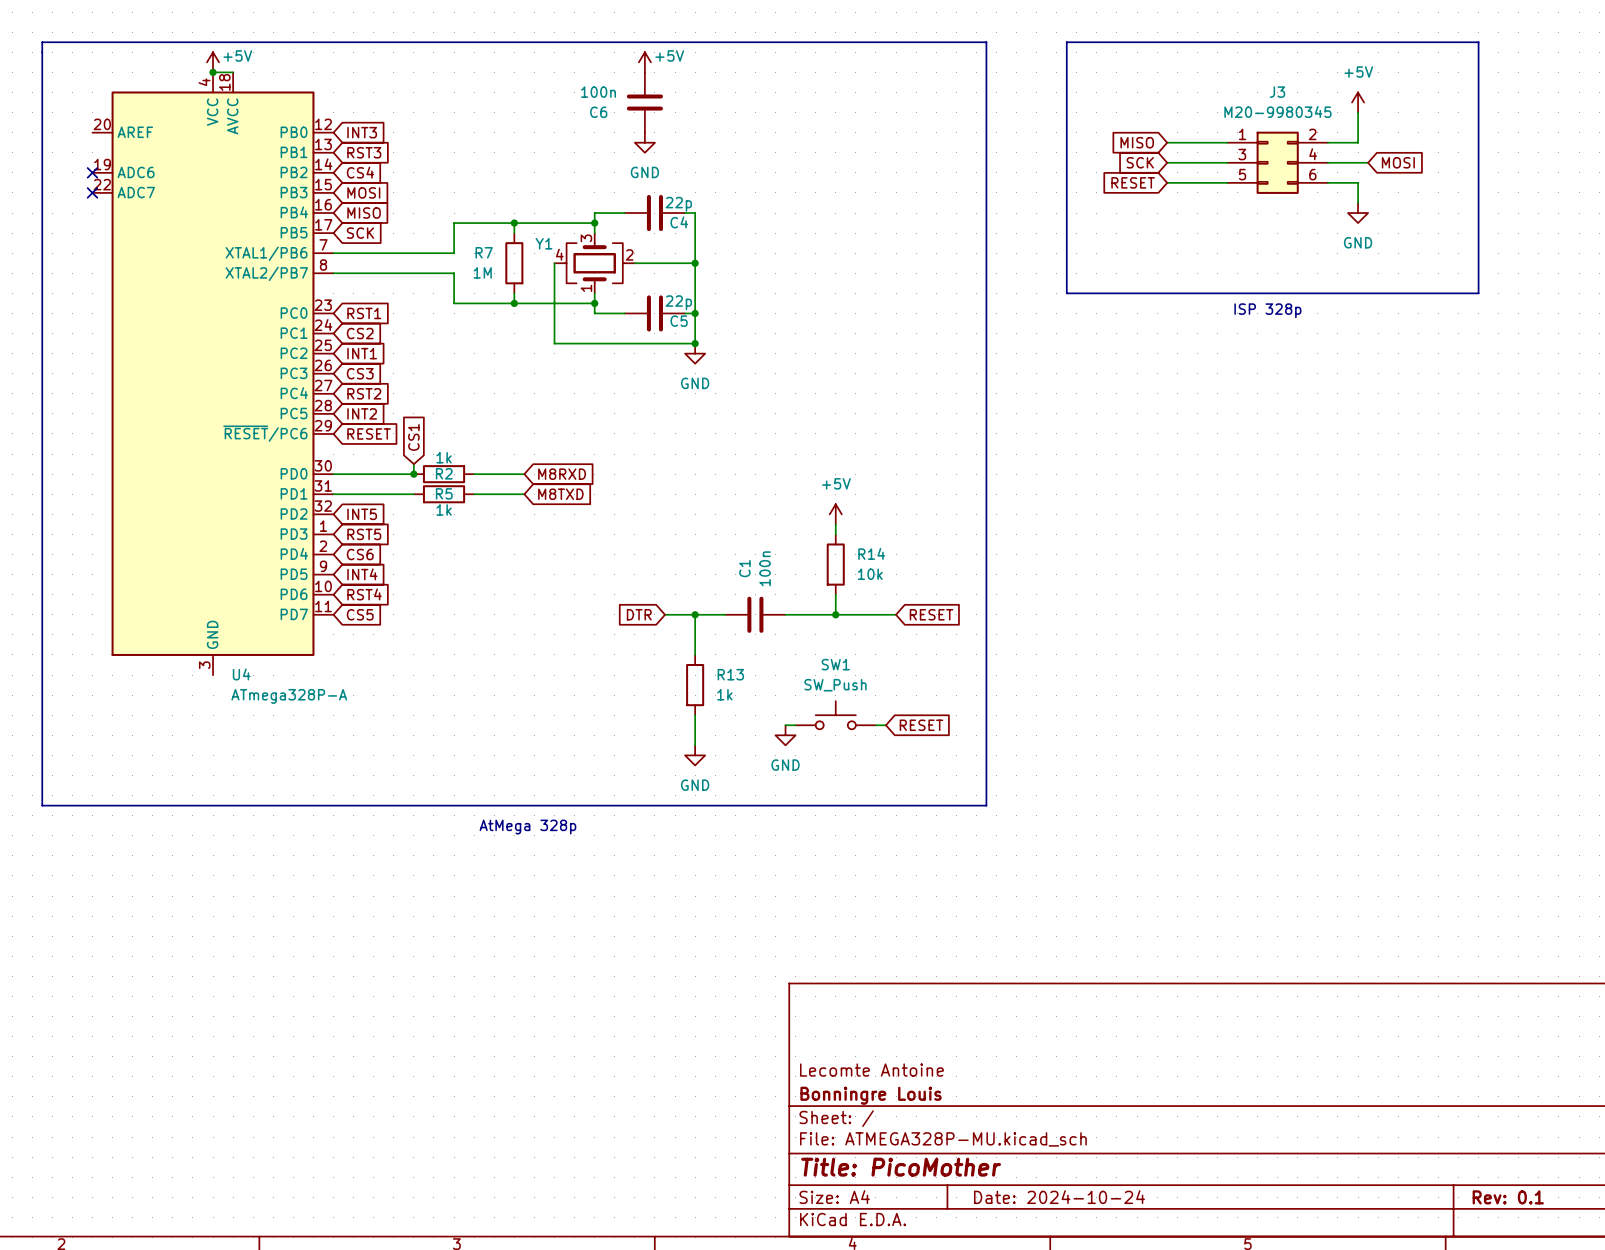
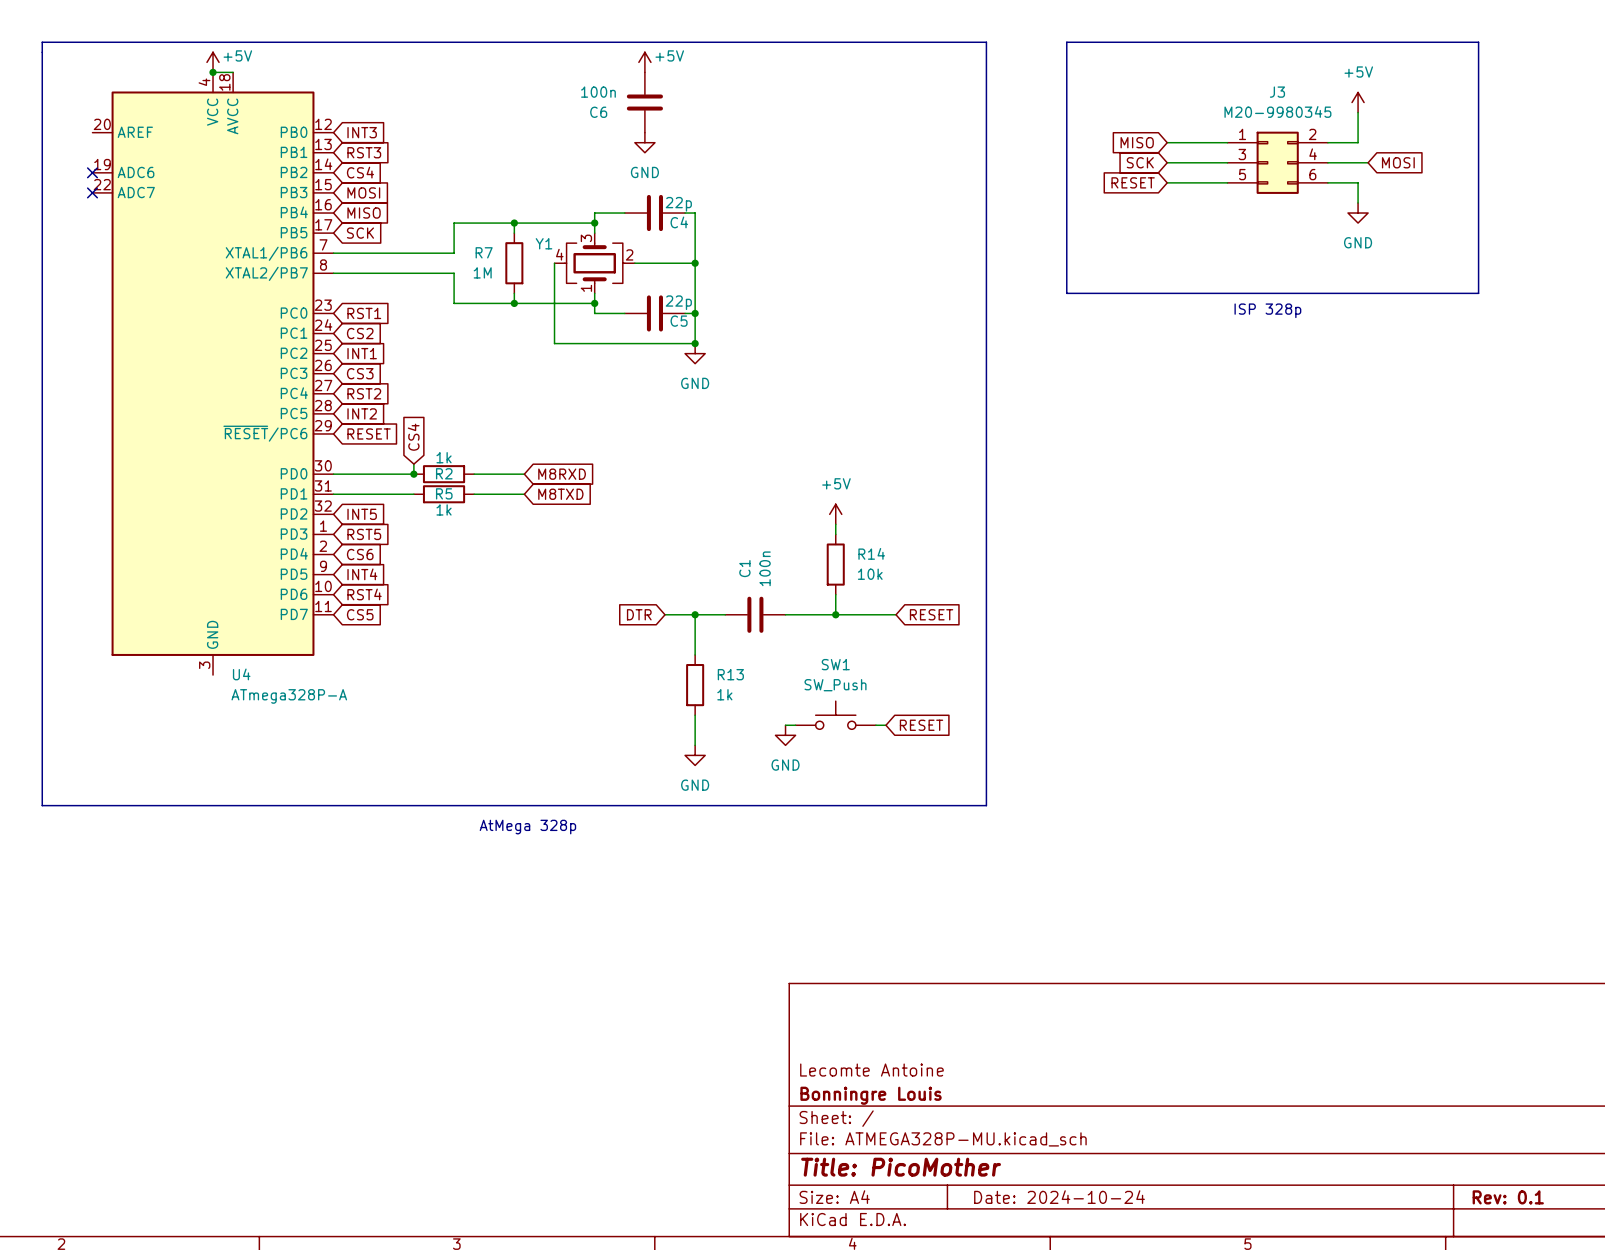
global label: CS1 (413, 437) -> CS4 (413, 437)

